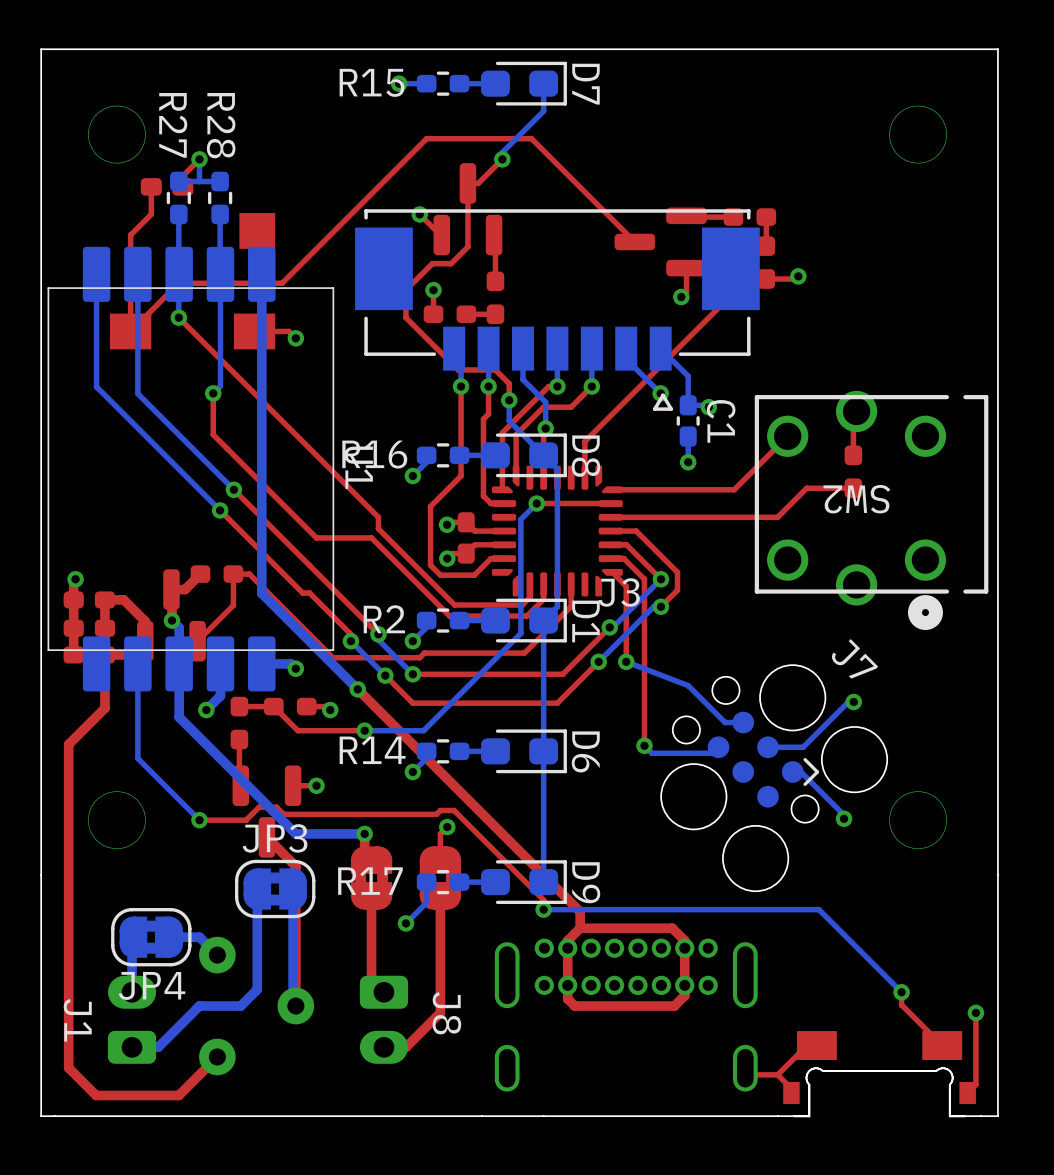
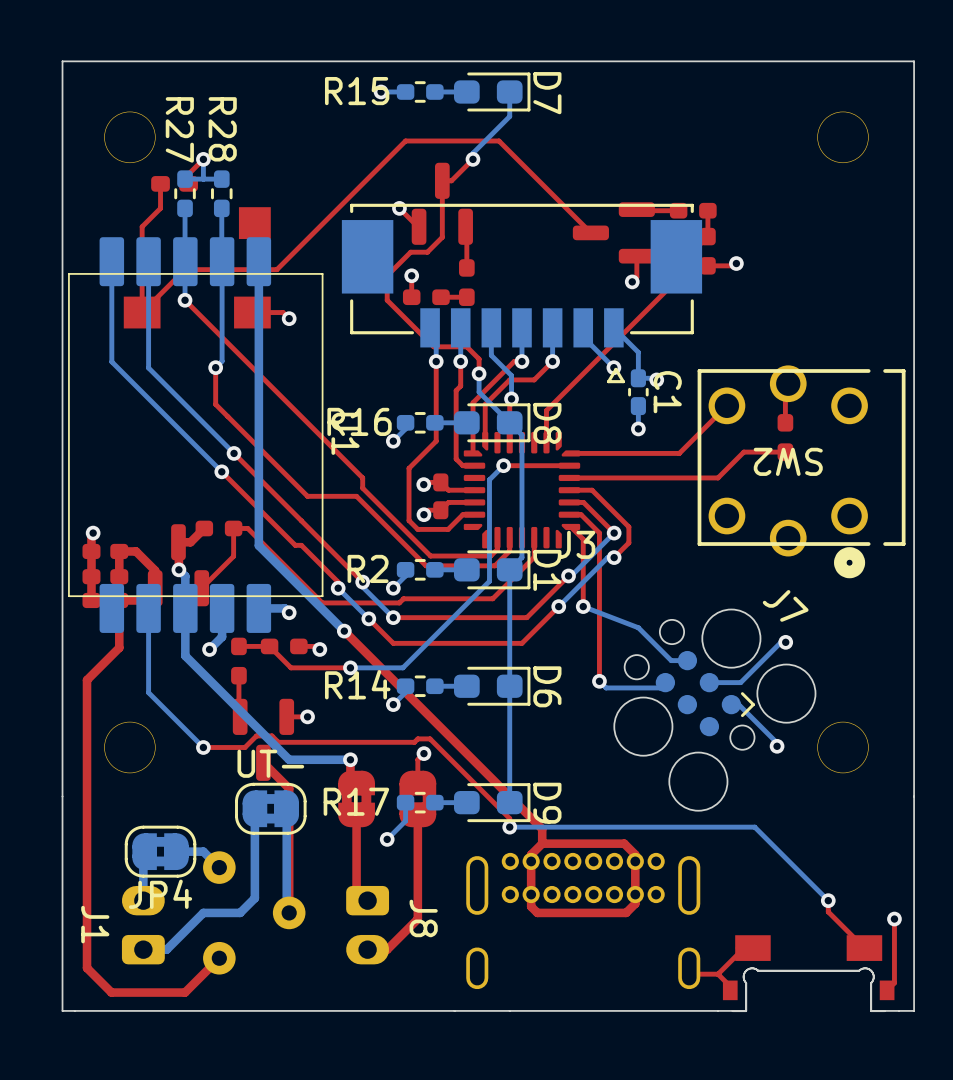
JP3 name: JP3 (275, 838) -> UT- (270, 763)

